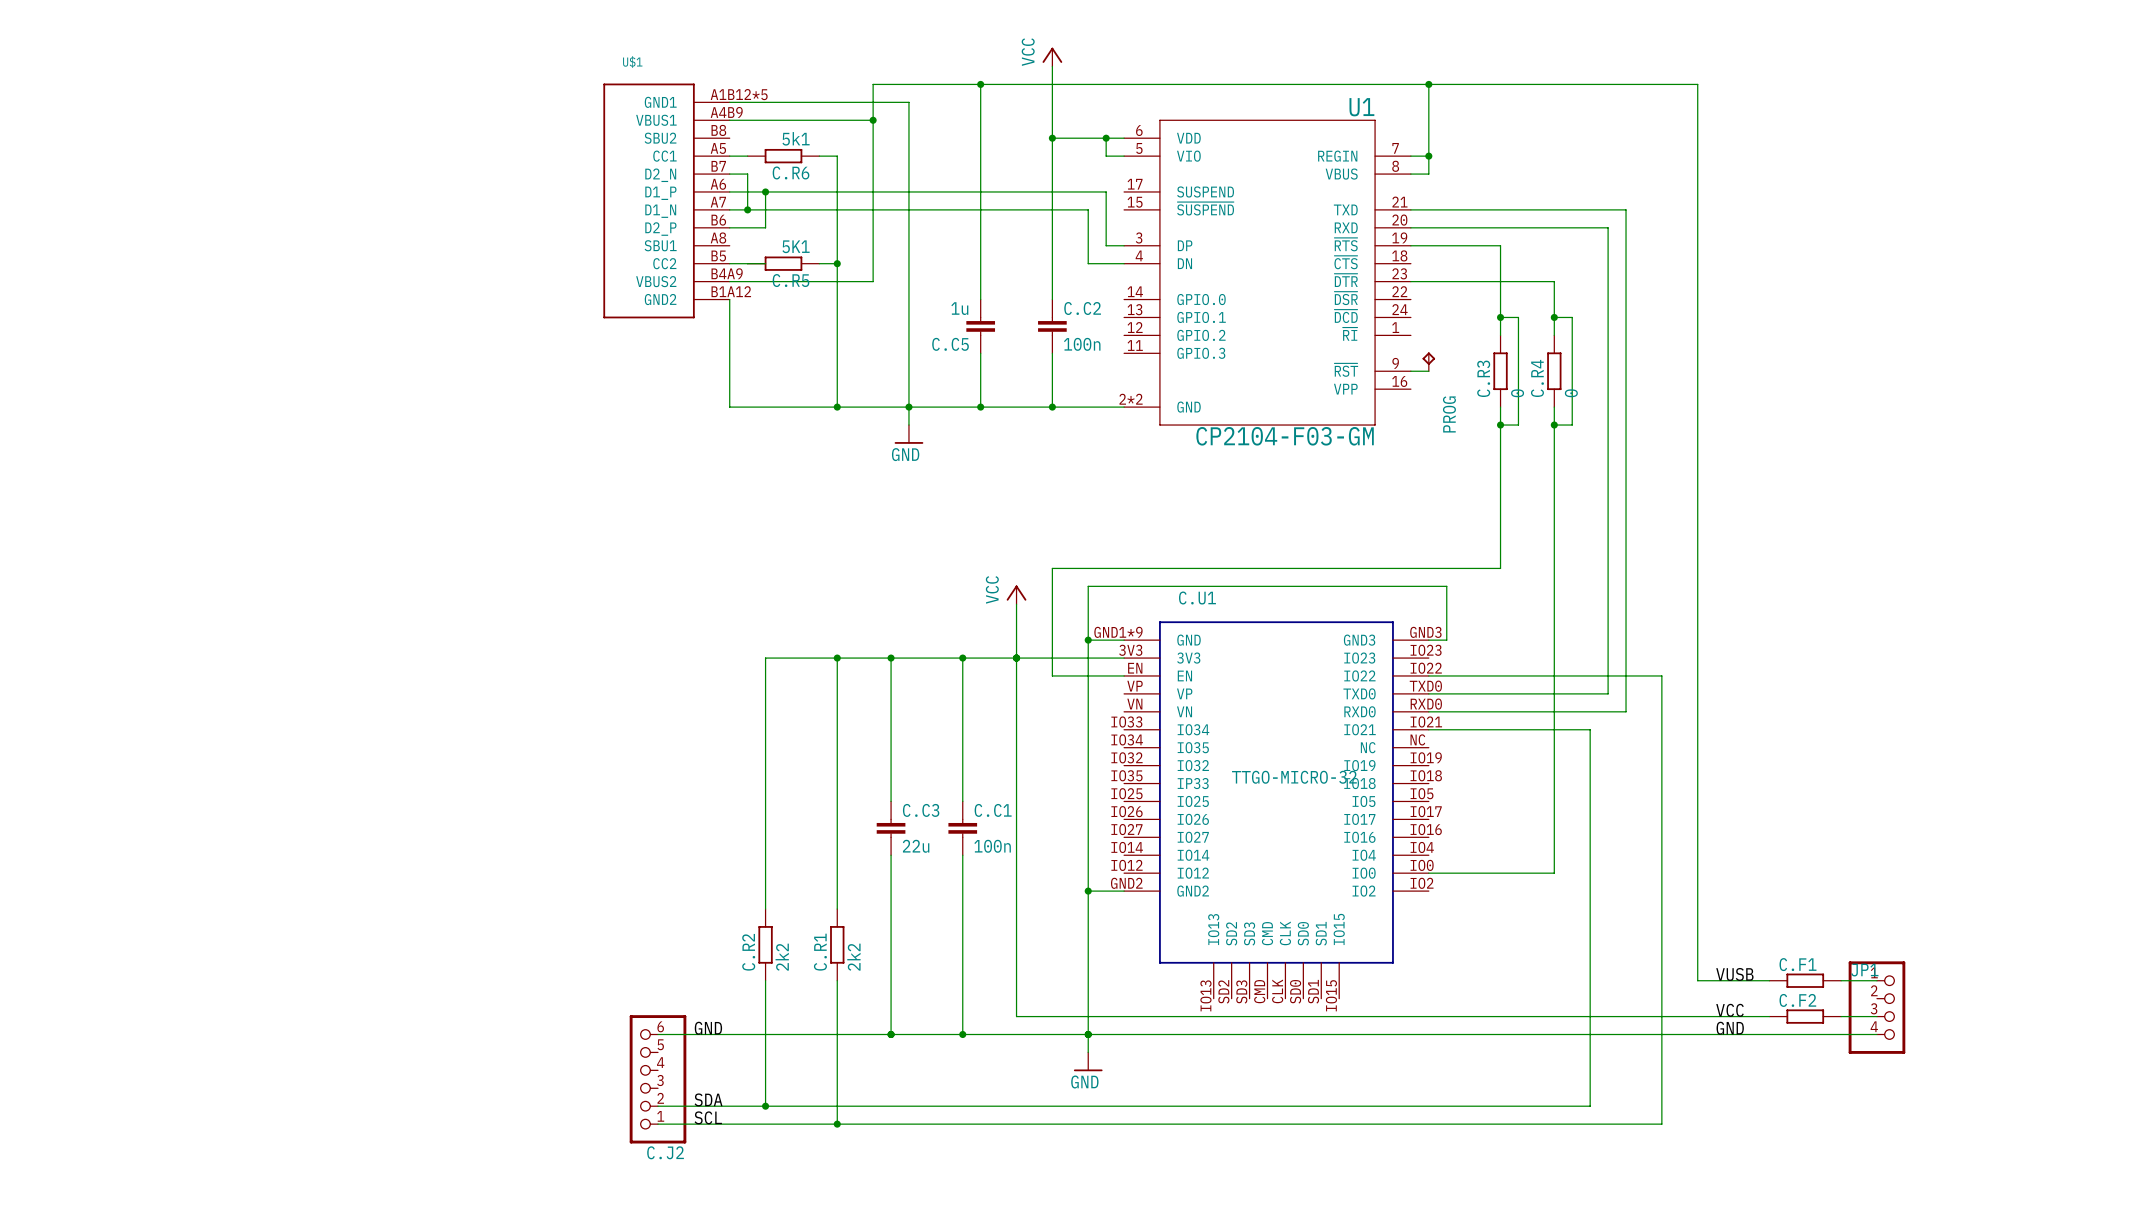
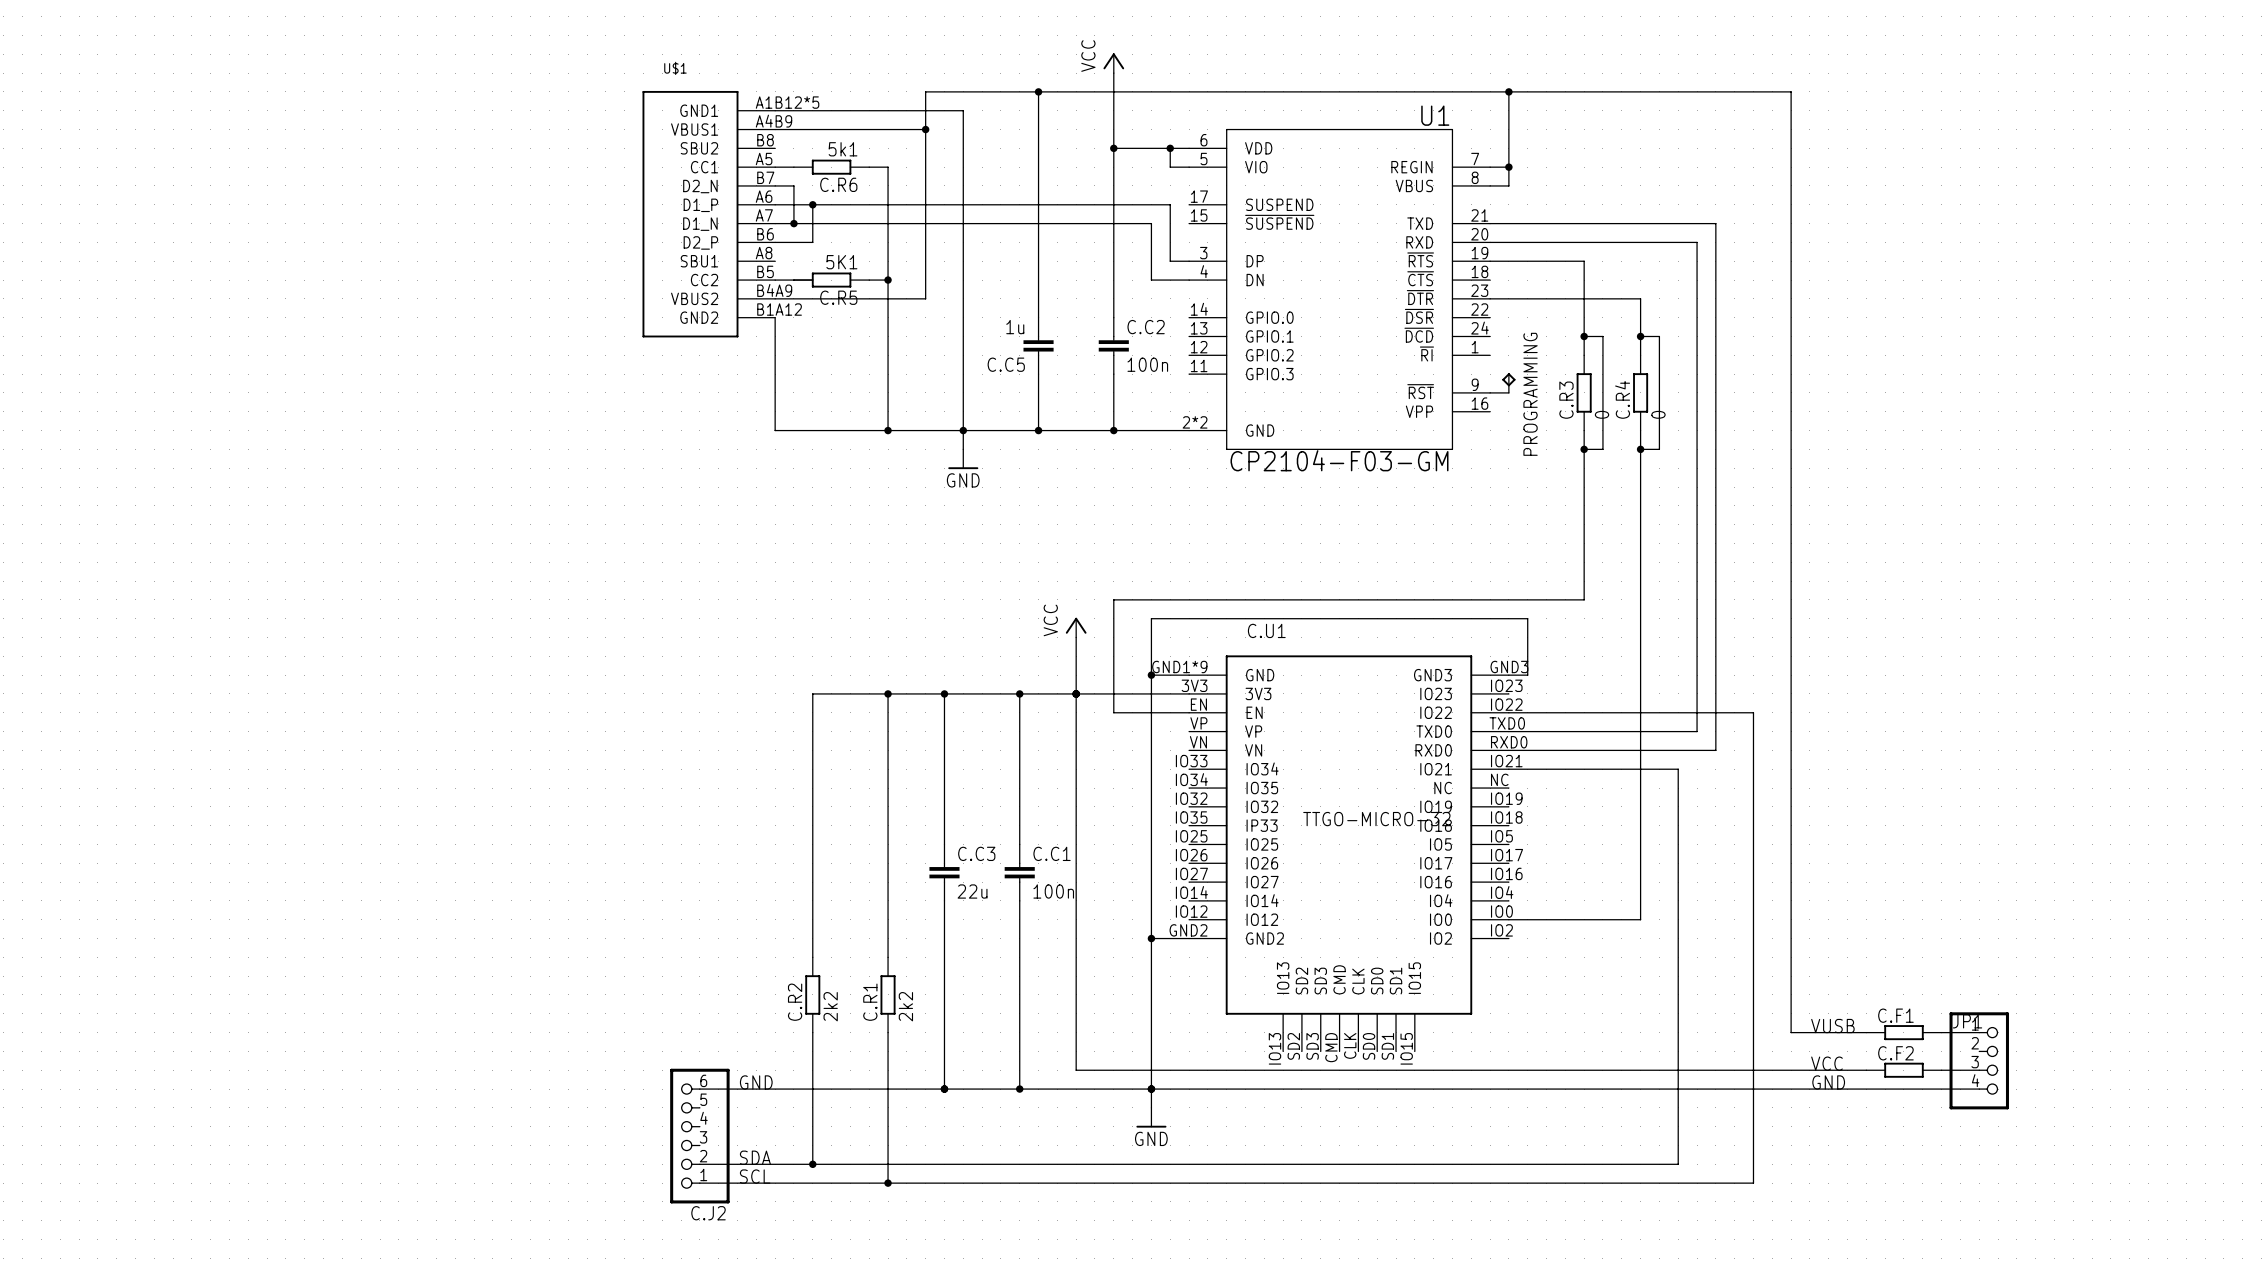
PROG name: PROG (1449, 414) -> PROGRAMMING (1530, 394)

